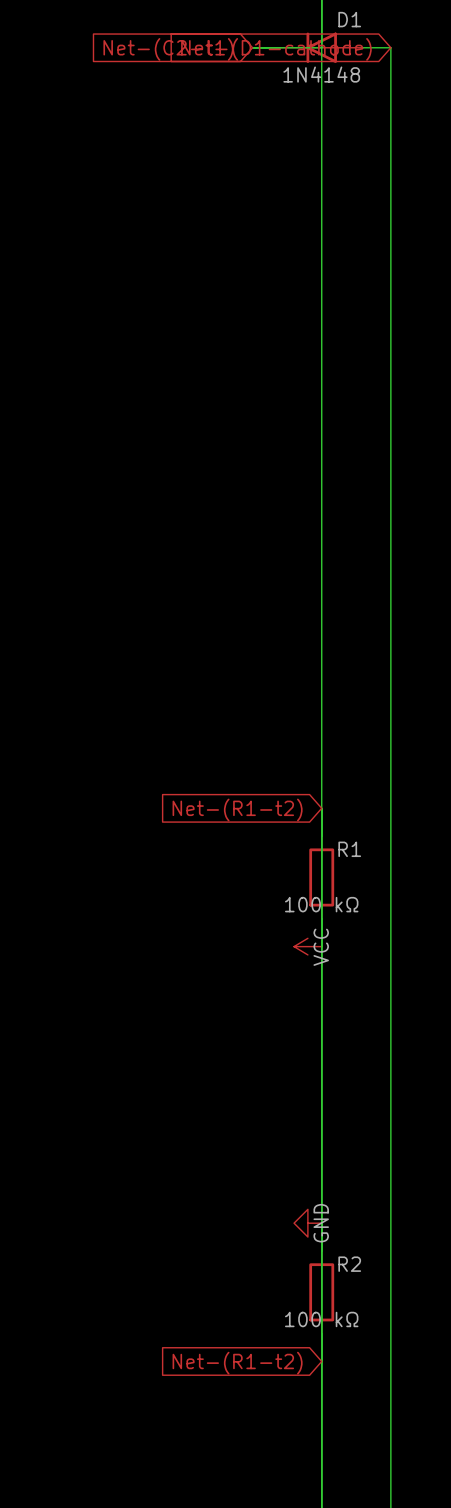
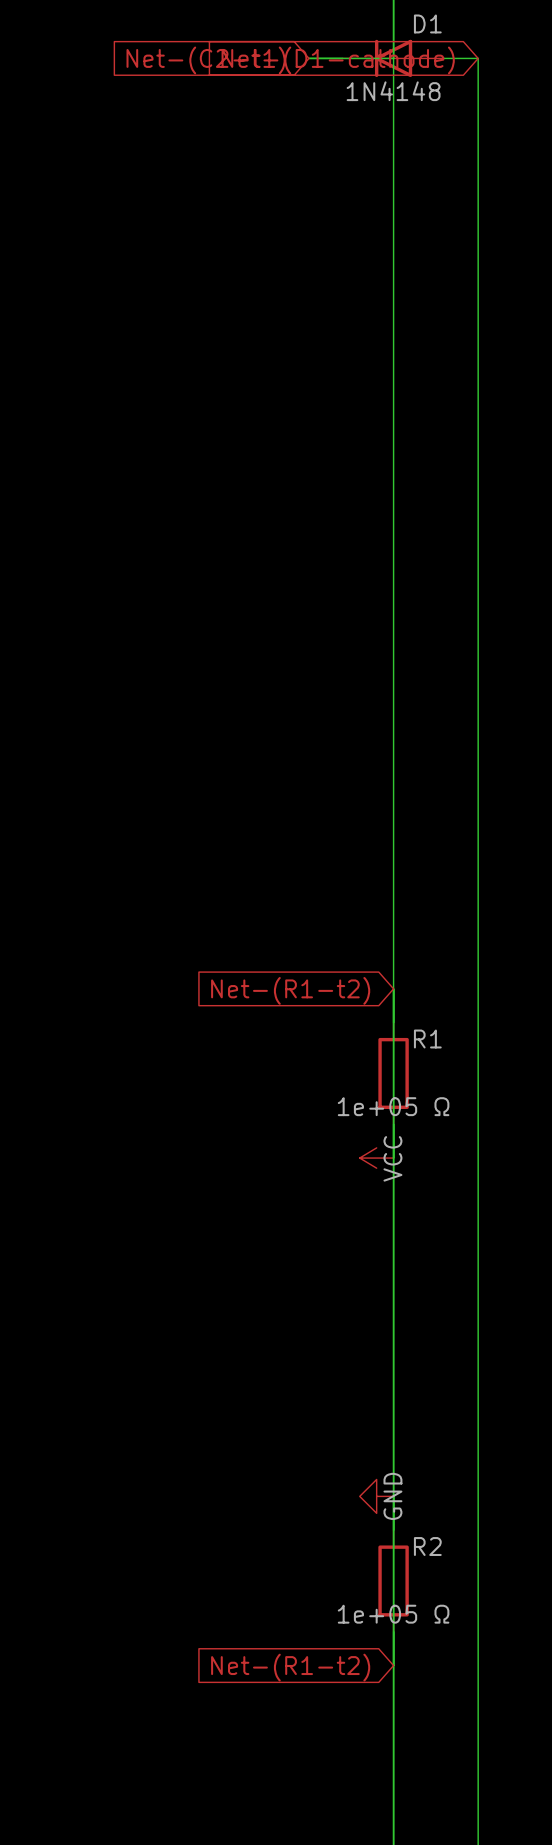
R1 value: 100 kΩ (321, 904) -> 1e+05 Ω (393, 1106)
R2 value: 100 kΩ (321, 1319) -> 1e+05 Ω (393, 1614)

